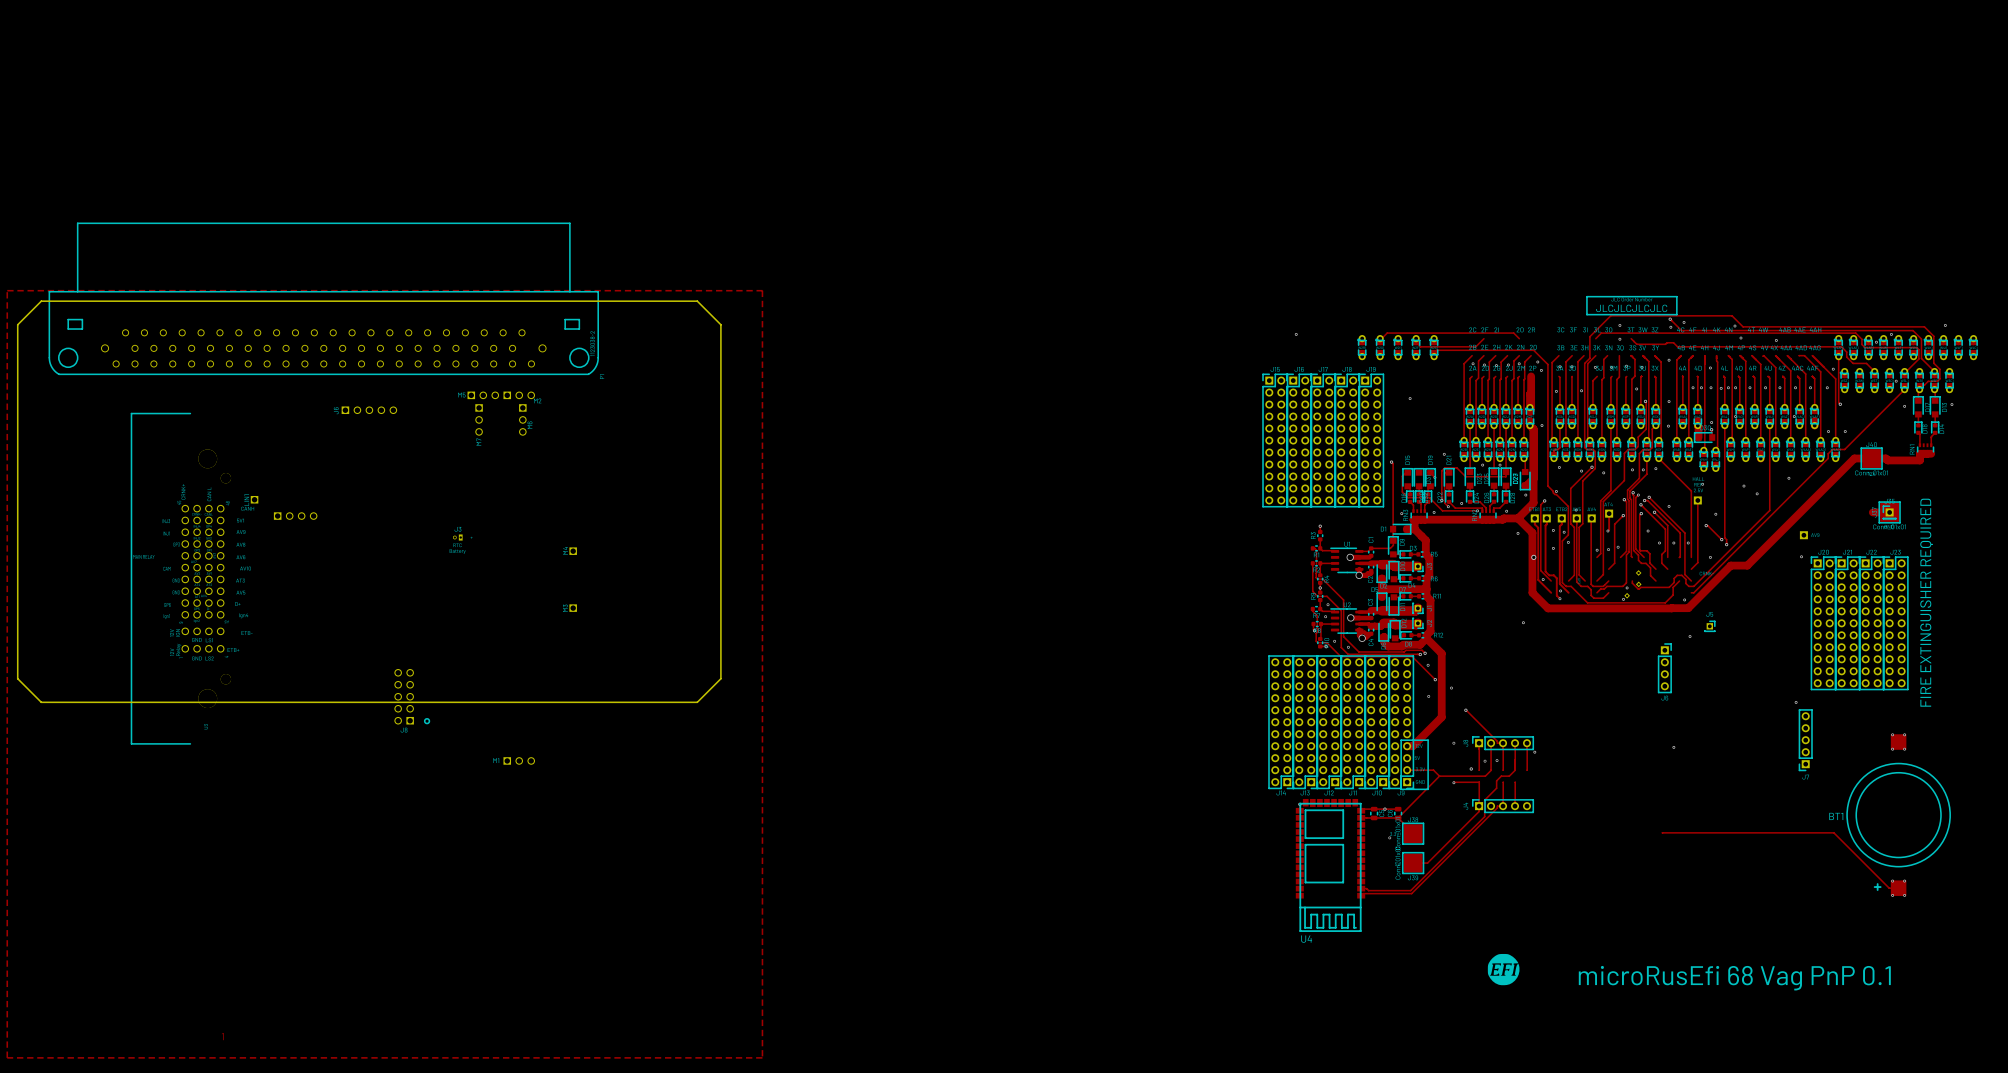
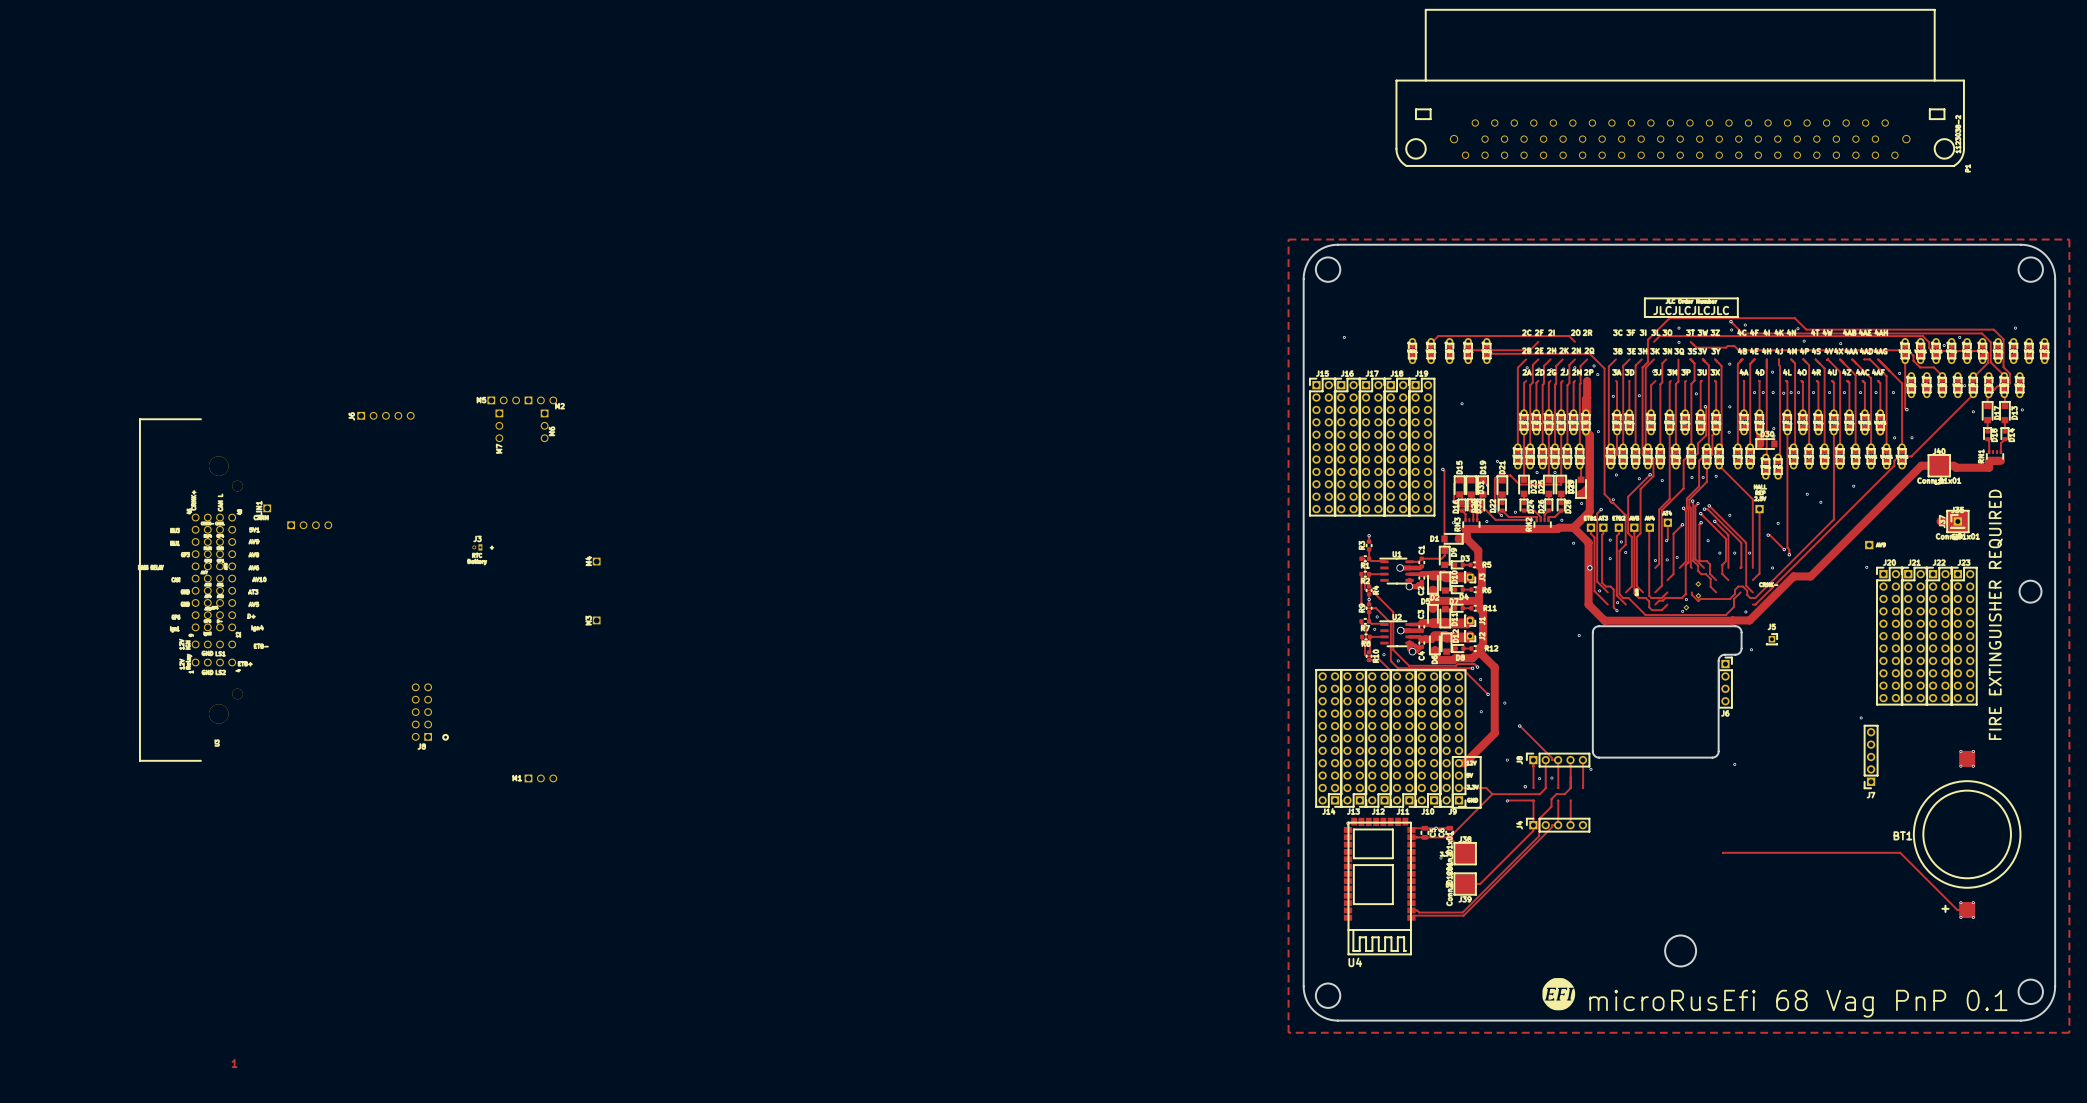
zone outline: none -> (1288, 239) (1288, 1032) (2069, 1032) (2069, 239) (1288, 239)
board edge: none -> (1337, 244) (2020, 244) (2034, 247) (2045, 254) (2052, 265) (2055, 278) (2055, 986) (2052, 999) (2045, 1010) (2034, 1018) (2020, 1020) (1337, 1020) (1324, 1018) (1313, 1010) (1306, 999) (1303, 986) (1303, 278) (1306, 265) (1313, 254) (1324, 247) (1337, 244)
round board edge: none -> [1315, 256, 1341, 283]
round board edge: none -> [2018, 256, 2044, 283]
zone outline: (7, 290) (7, 1057) (762, 1057) (762, 290) (7, 290) -> none
part position: (323, 298) -> (1680, 87)
board edge: (41, 301) (17, 324) (17, 678) (41, 702) (697, 702) (720, 678) (720, 324) (697, 301) (41, 301) -> none
round board edge: none -> [2019, 580, 2042, 604]
board edge: none -> (1599, 626) (1735, 626) (1739, 628) (1741, 632) (1740, 651) (1736, 654) (1722, 655) (1718, 660) (1718, 751) (1716, 755) (1712, 757) (1599, 757) (1594, 755) (1592, 751) (1592, 632) (1594, 628) (1599, 626)
round board edge: none -> [1664, 934, 1697, 967]
round board edge: none -> [2018, 979, 2044, 1005]
round board edge: none -> [1315, 983, 1341, 1009]

